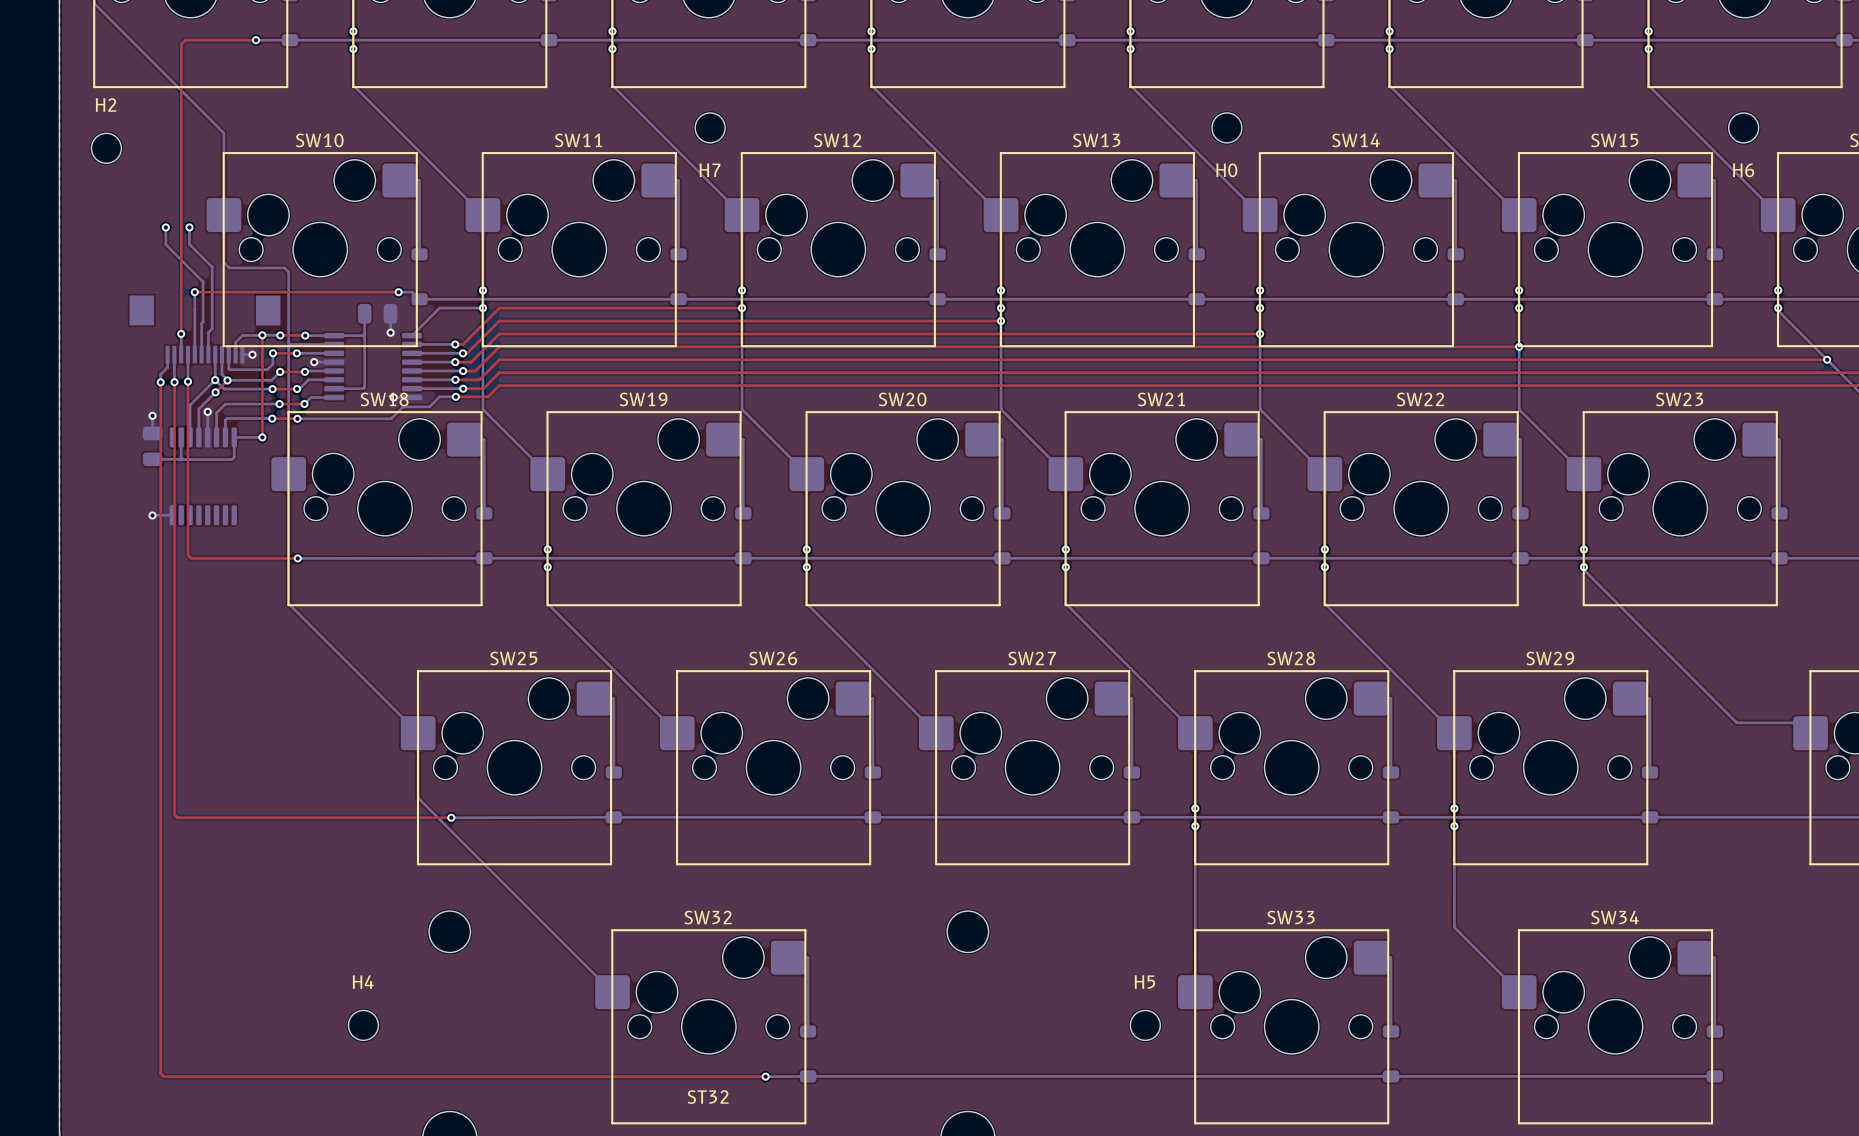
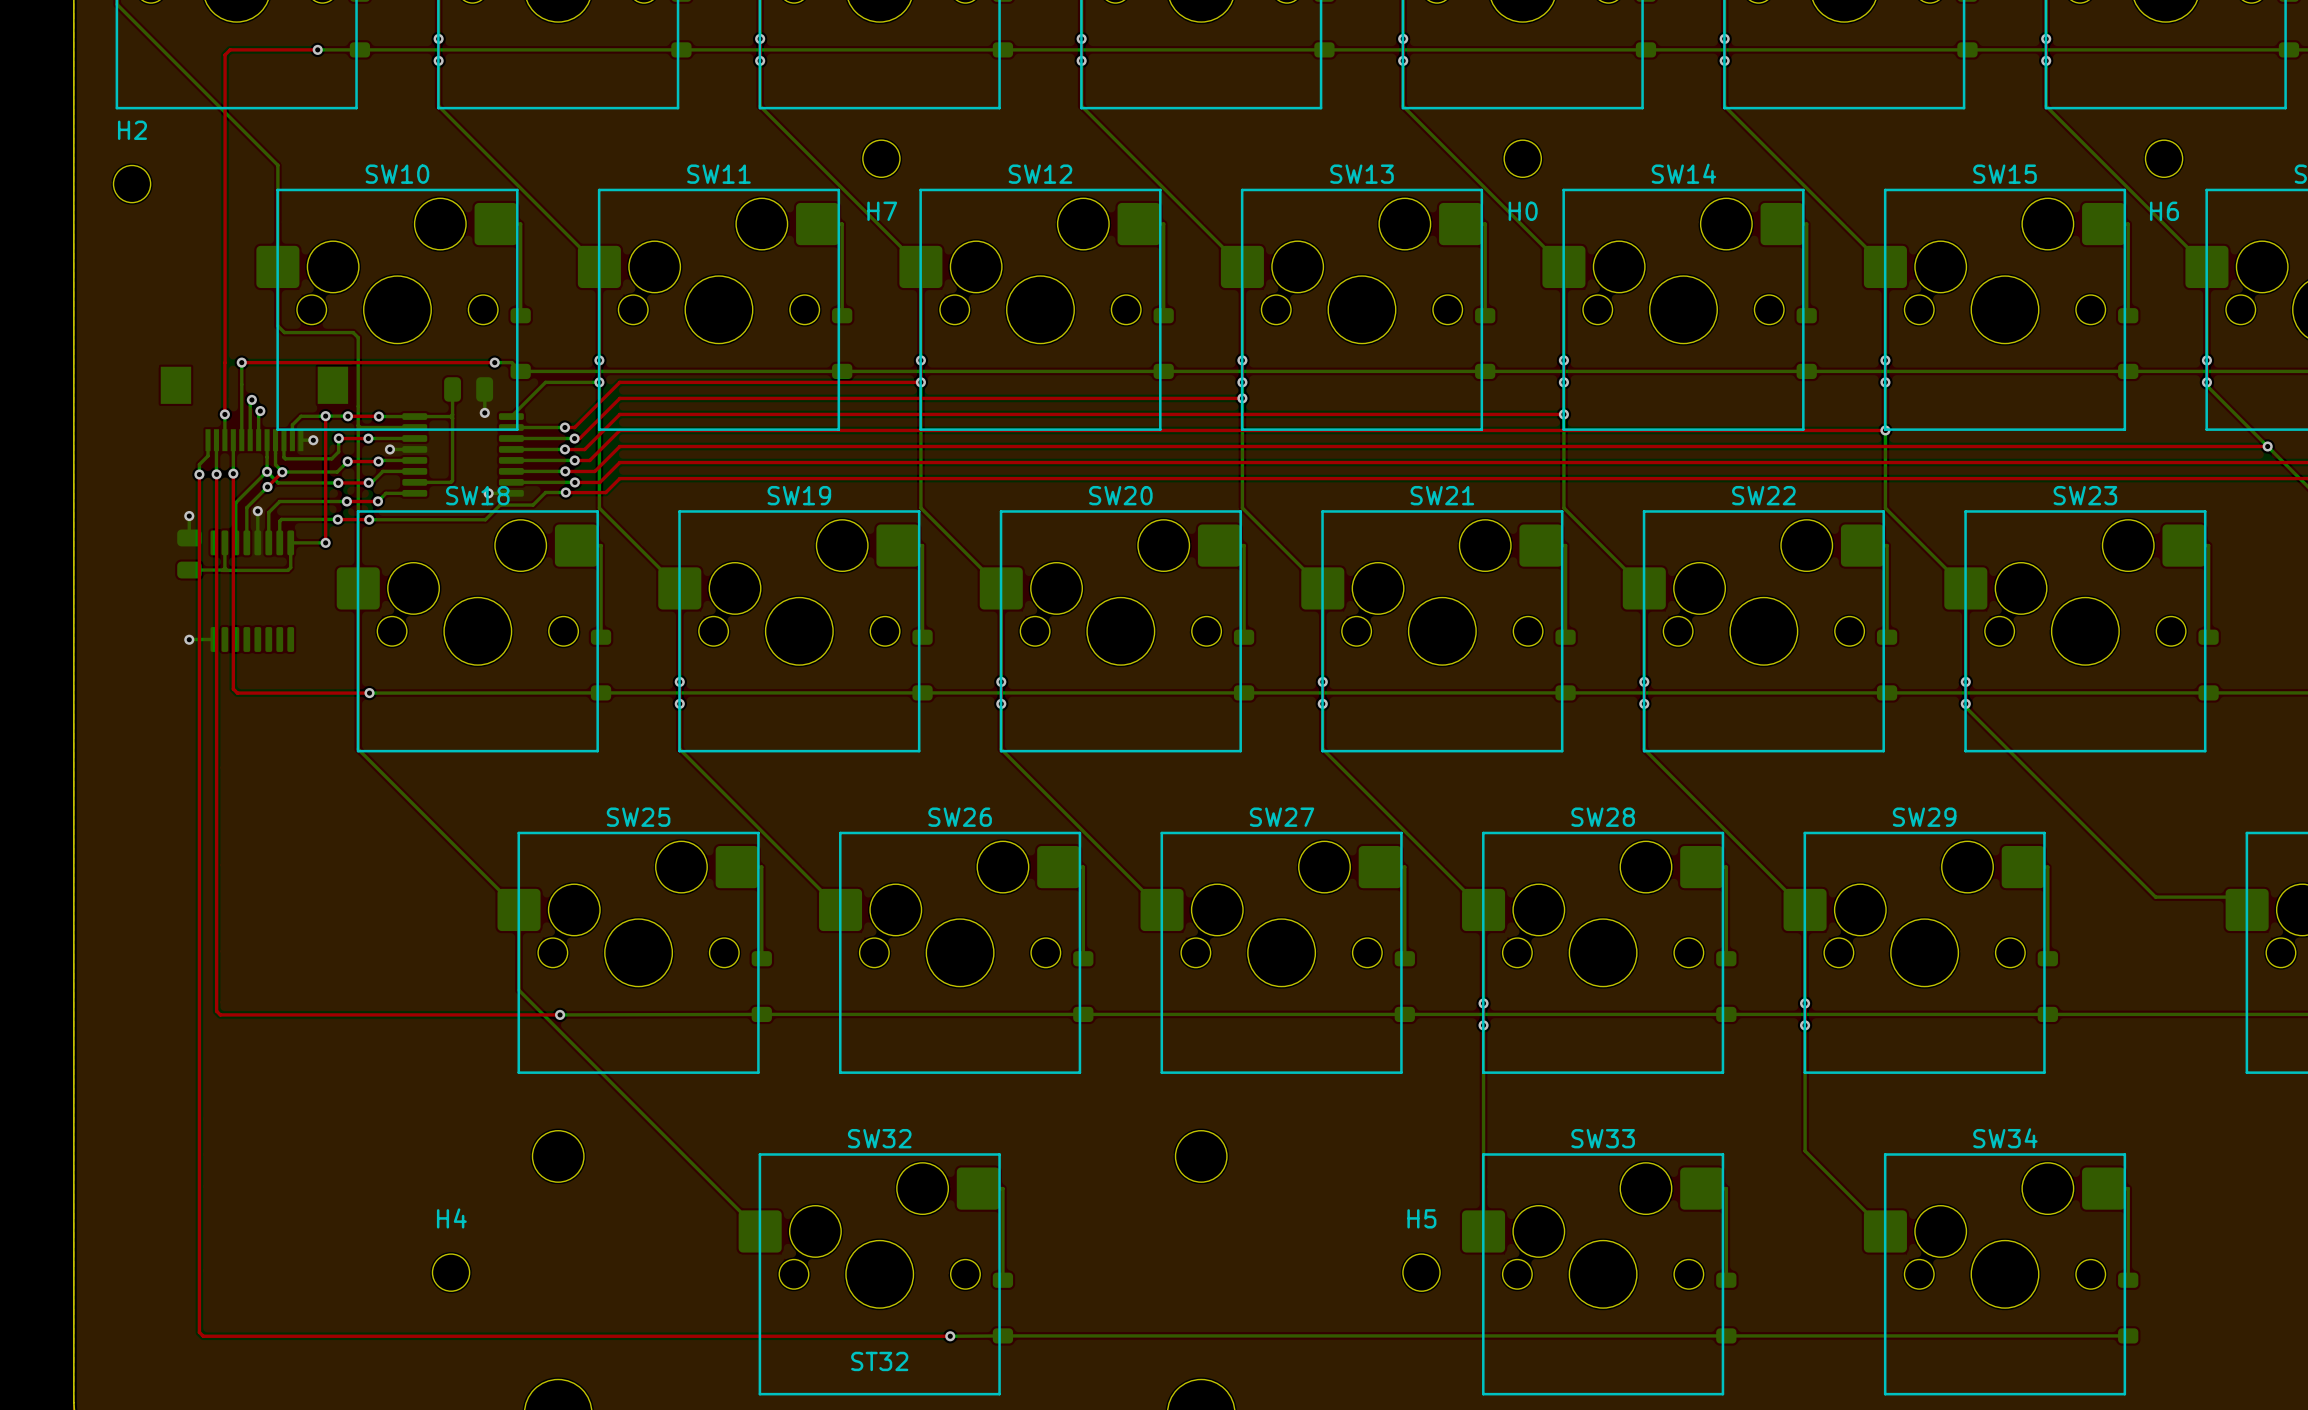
bottom track: (165, 227) (165, 244) (203, 281) (203, 322) -> none
via: (165, 227) -> none
bottom track: (189, 227) (189, 244) (212, 267) (212, 328) (209, 331) -> none
via: (189, 227) -> none
via: none -> (251, 399)
via: none -> (260, 411)

